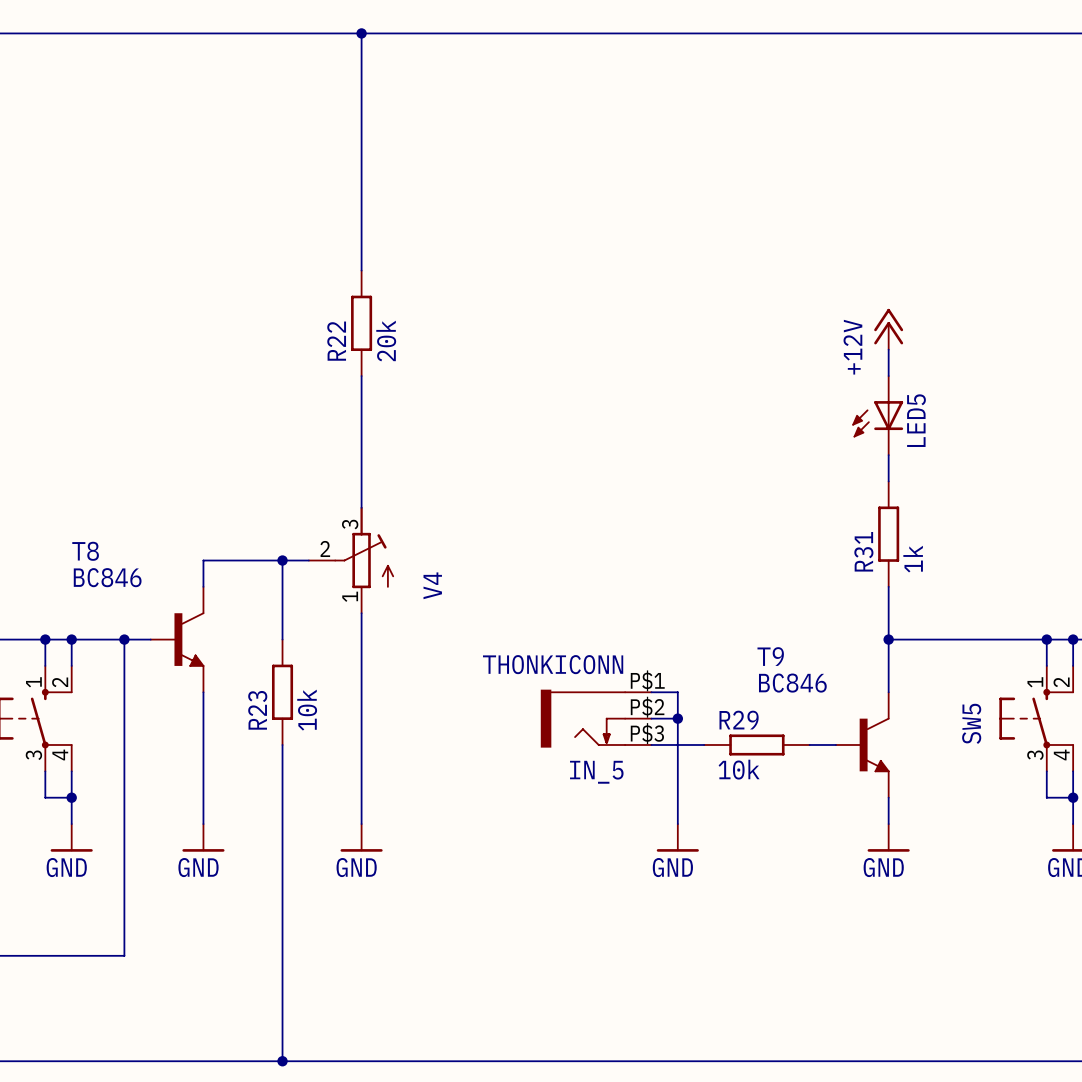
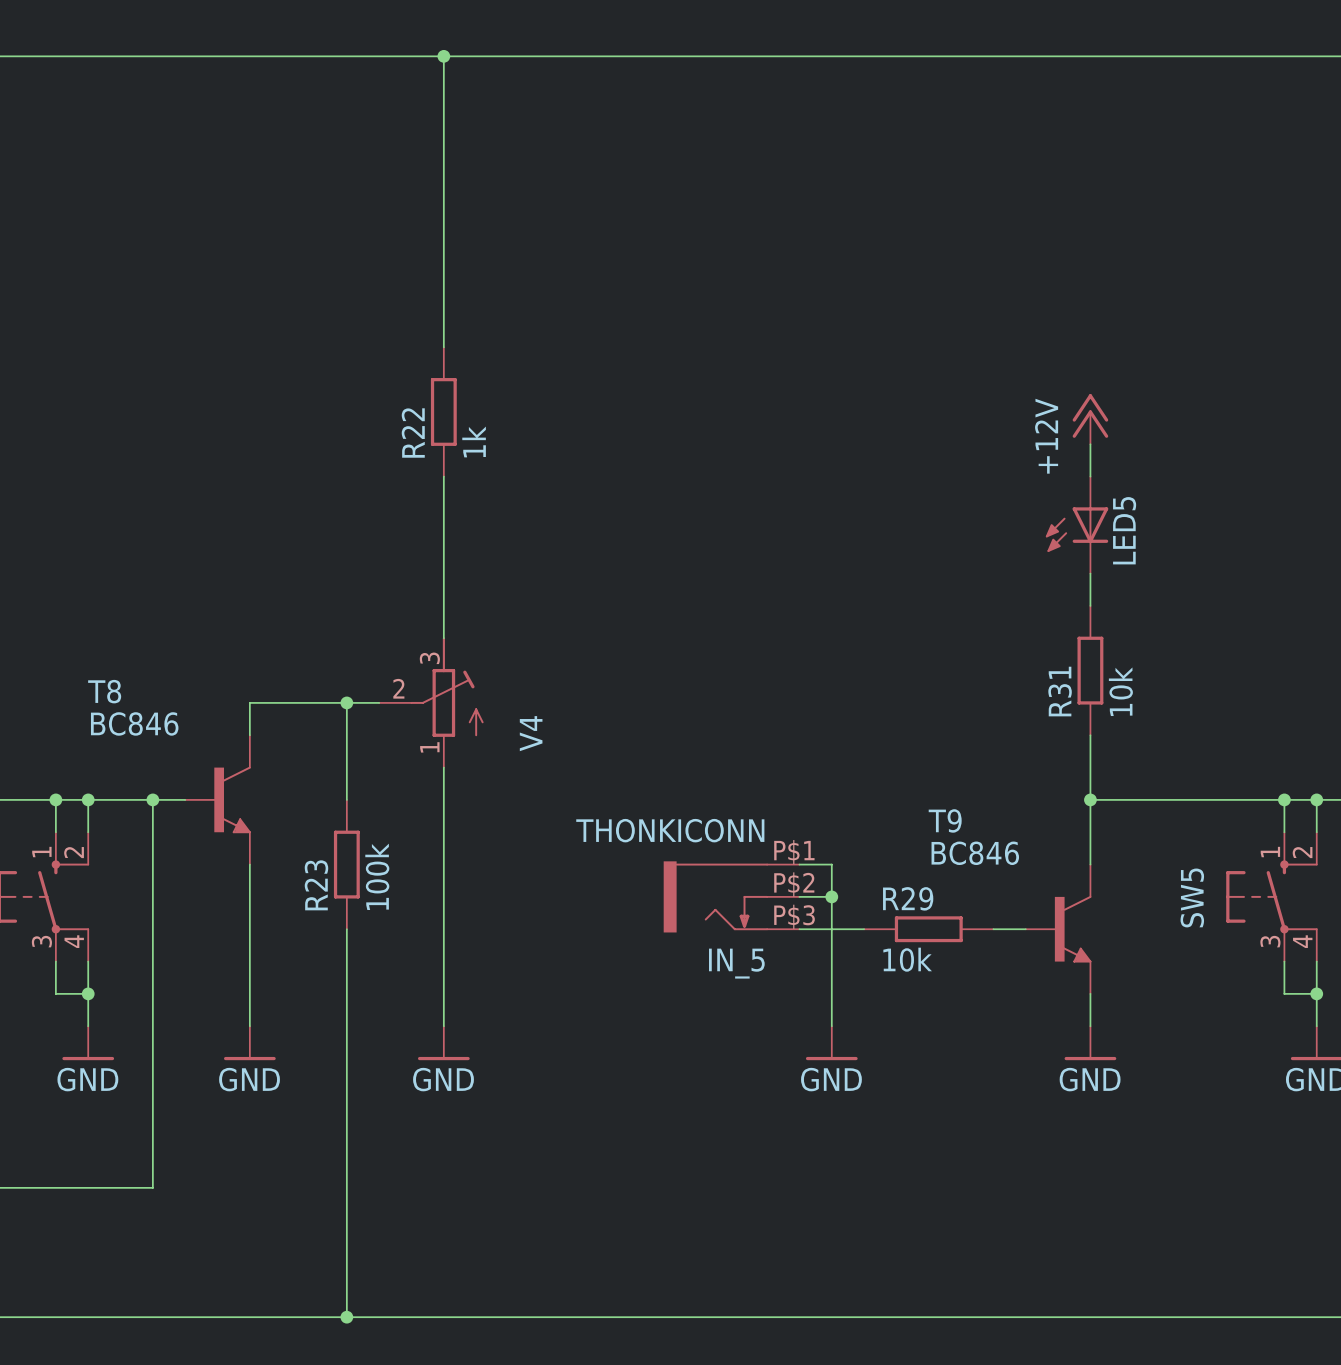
R22 value: 20k (386, 340) -> 1k (474, 441)
R31 value: 1k (913, 559) -> 10k (1120, 691)
R23 value: 10k (307, 710) -> 100k (377, 876)

